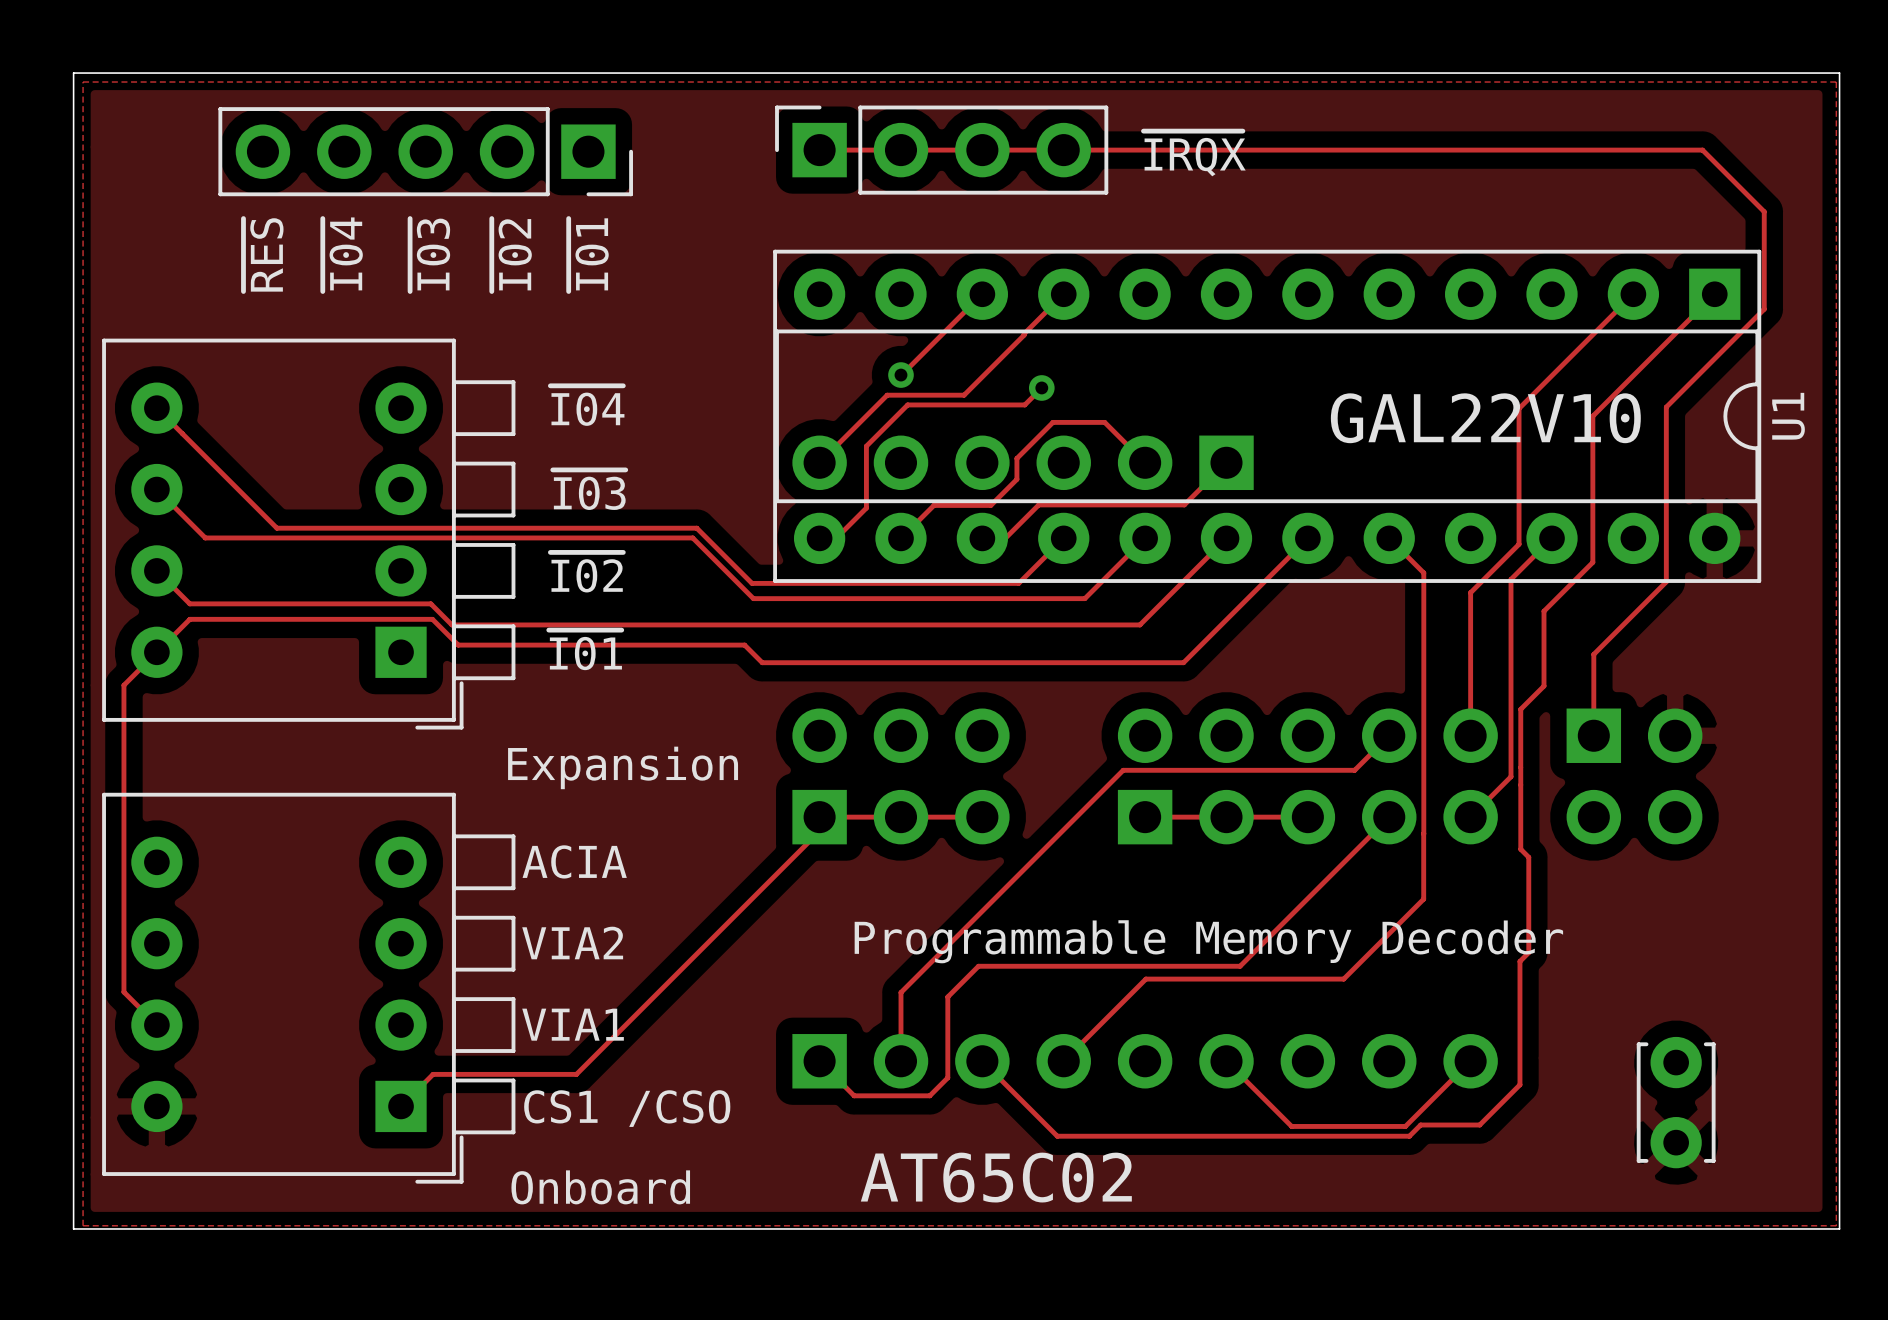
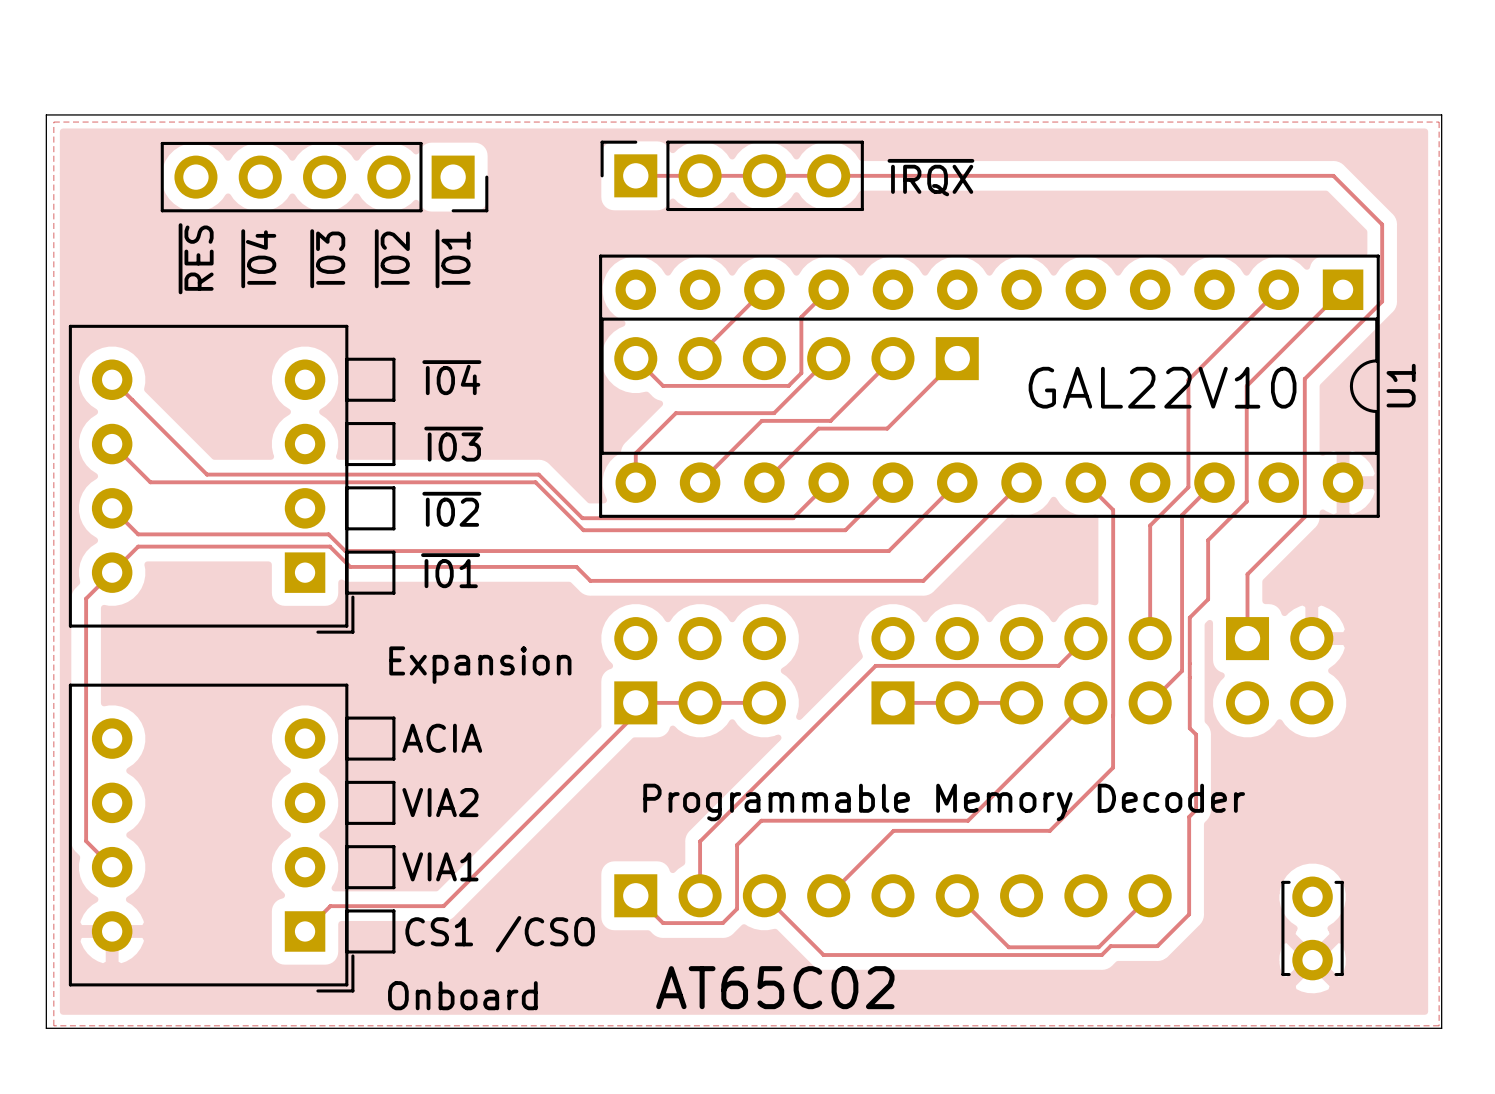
track: (1029, 328) (964, 395) (887, 395) (819, 462) -> (801, 317) (801, 373) (788, 385) (663, 385) (635, 358)
via: (900, 375) -> none
track: (1041, 387) (1024, 404) (907, 404) (866, 446) (866, 508) (836, 538) (819, 538) -> (828, 358) (774, 413) (675, 413) (635, 453) (635, 482)
via: (1041, 387) -> none
part position: (1023, 462) -> (796, 358)
track: (1145, 462) (1104, 422) (1052, 422) (1016, 458) (1016, 479) (990, 505) (933, 505) -> (892, 358) (830, 420) (761, 420) (726, 456)
track: (1226, 462) (1184, 504) (1038, 504) (1005, 538) (982, 538) -> (957, 358) (887, 428) (818, 428) (764, 482)

